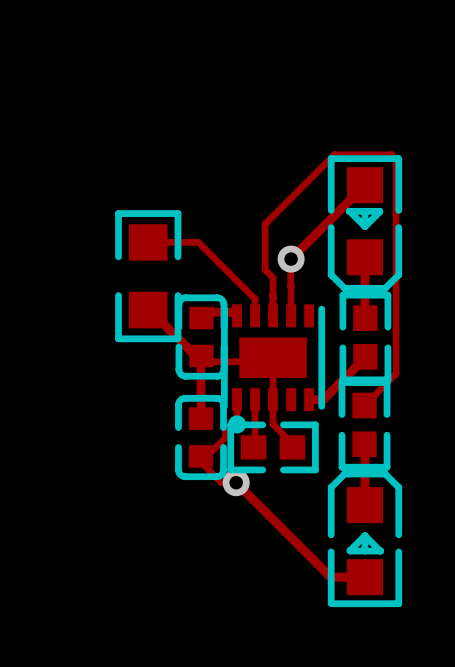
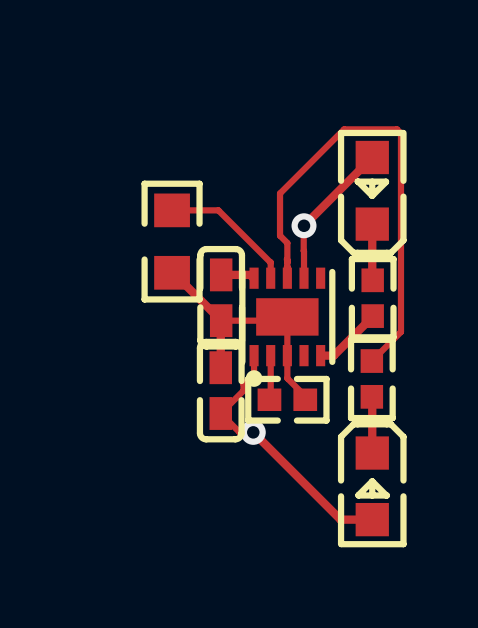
part footprint: [175, 294, 228, 380] -> [197, 245, 246, 350]
part footprint: [175, 394, 227, 481] -> [196, 338, 245, 443]

